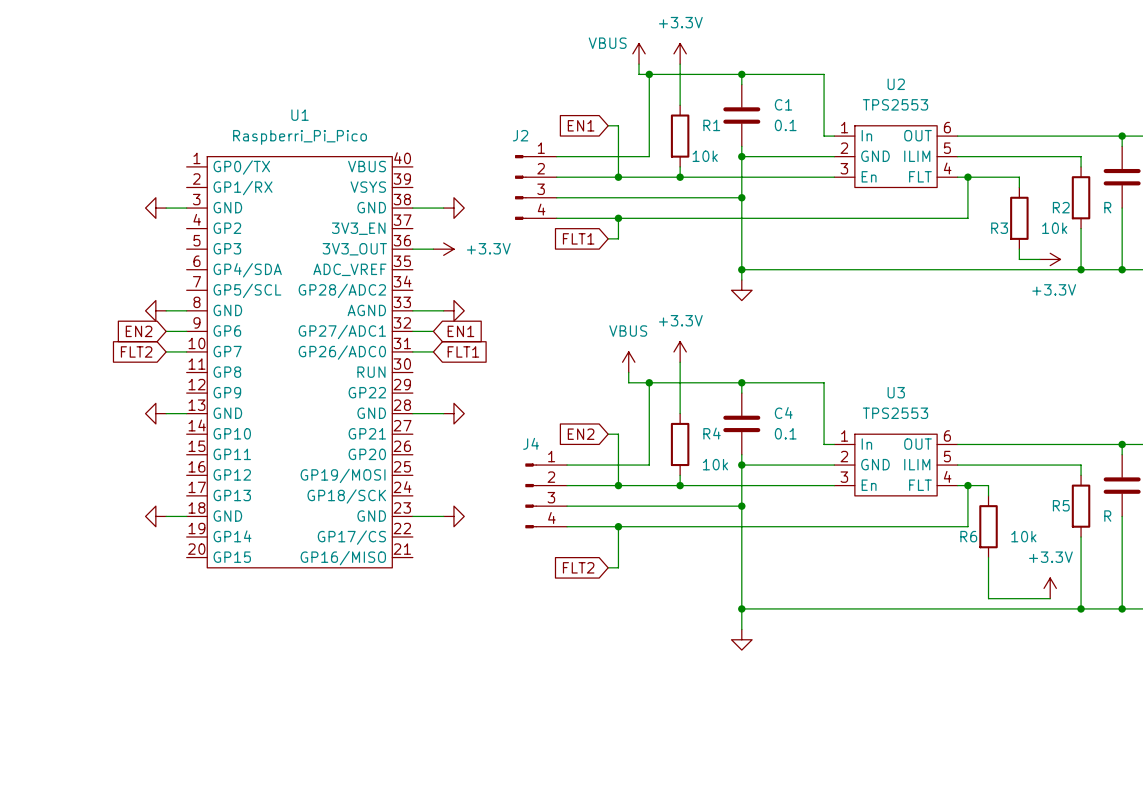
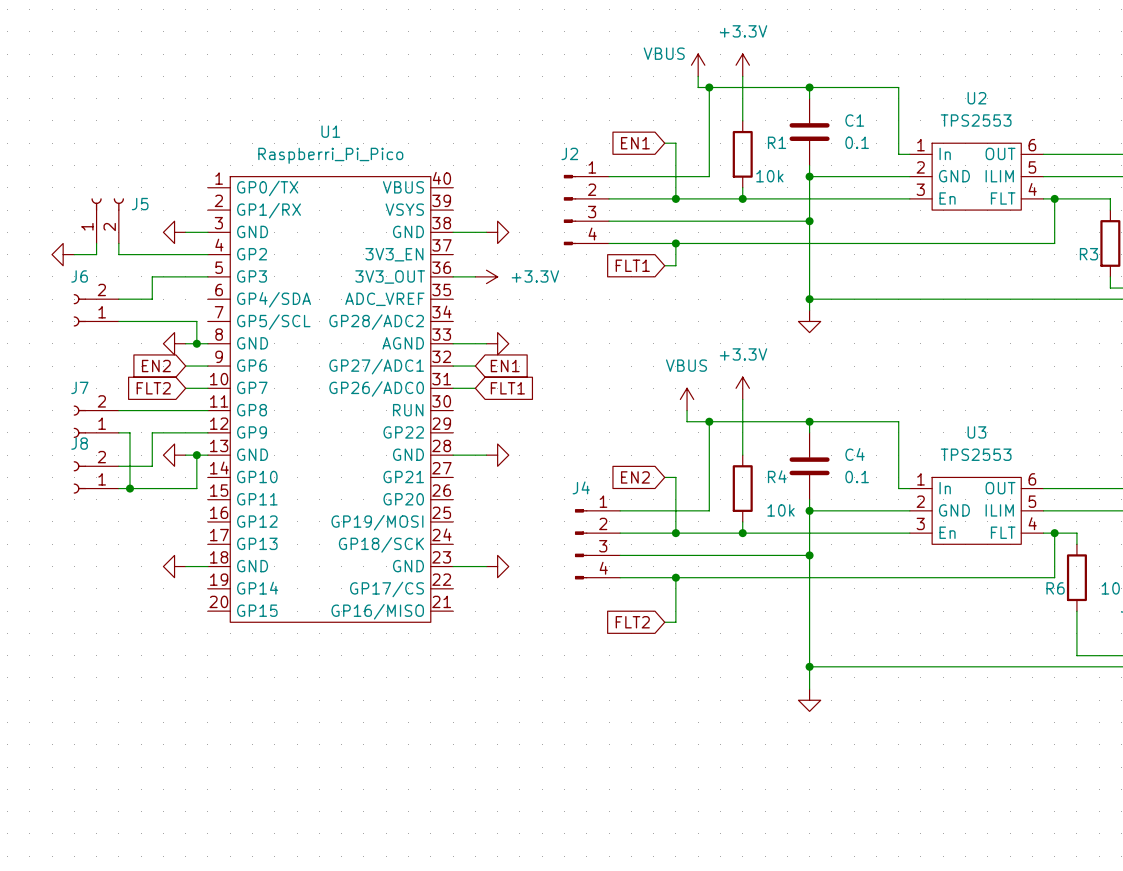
J5: none -> (107, 220)
wire: none -> (96, 243) (96, 254) (74, 254)
wire: none -> (118, 243) (118, 254) (207, 254)
power symbol: none -> (63, 254)
wire: none -> (207, 276) (152, 276) (152, 299) (118, 299)
J6: none -> (96, 310)
wire: none -> (118, 321) (196, 321) (196, 343)
junction: none -> (196, 343)
wire: none -> (118, 410) (207, 410)
J7: none -> (96, 421)
wire: none -> (118, 432) (129, 432) (129, 488)
wire: none -> (207, 432) (152, 432) (152, 466) (118, 466)
wire: none -> (196, 455) (196, 488) (118, 488)
junction: none -> (196, 455)
J8: none -> (96, 477)
junction: none -> (129, 488)

